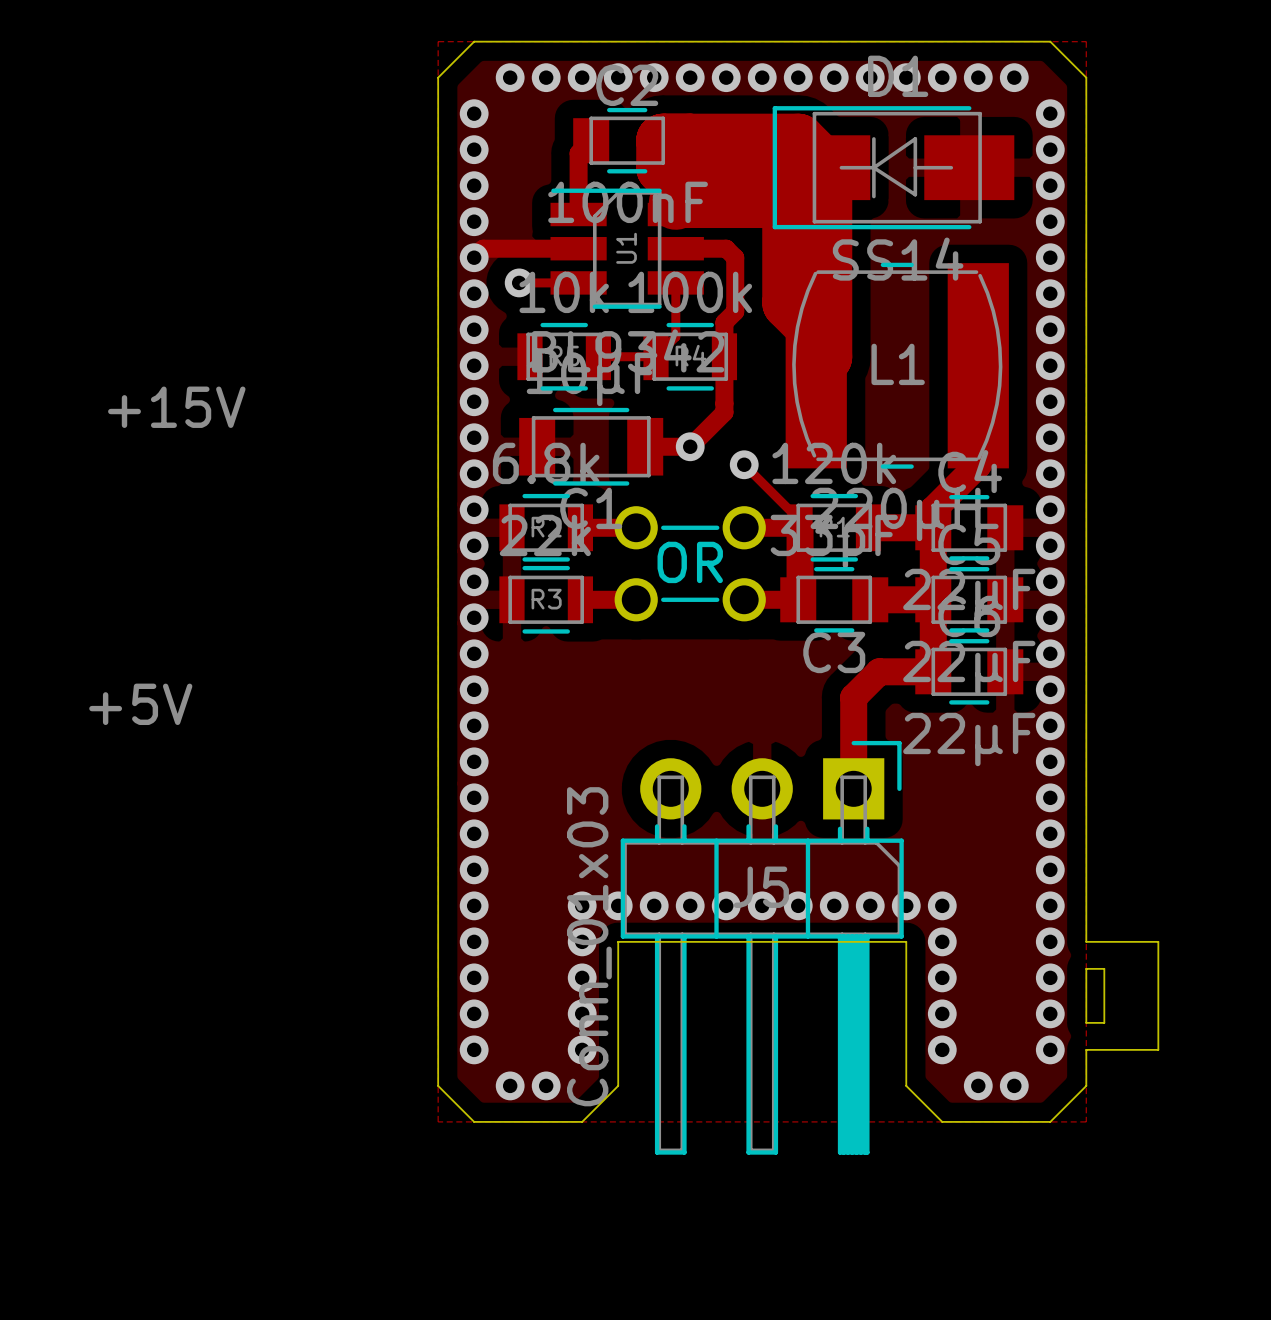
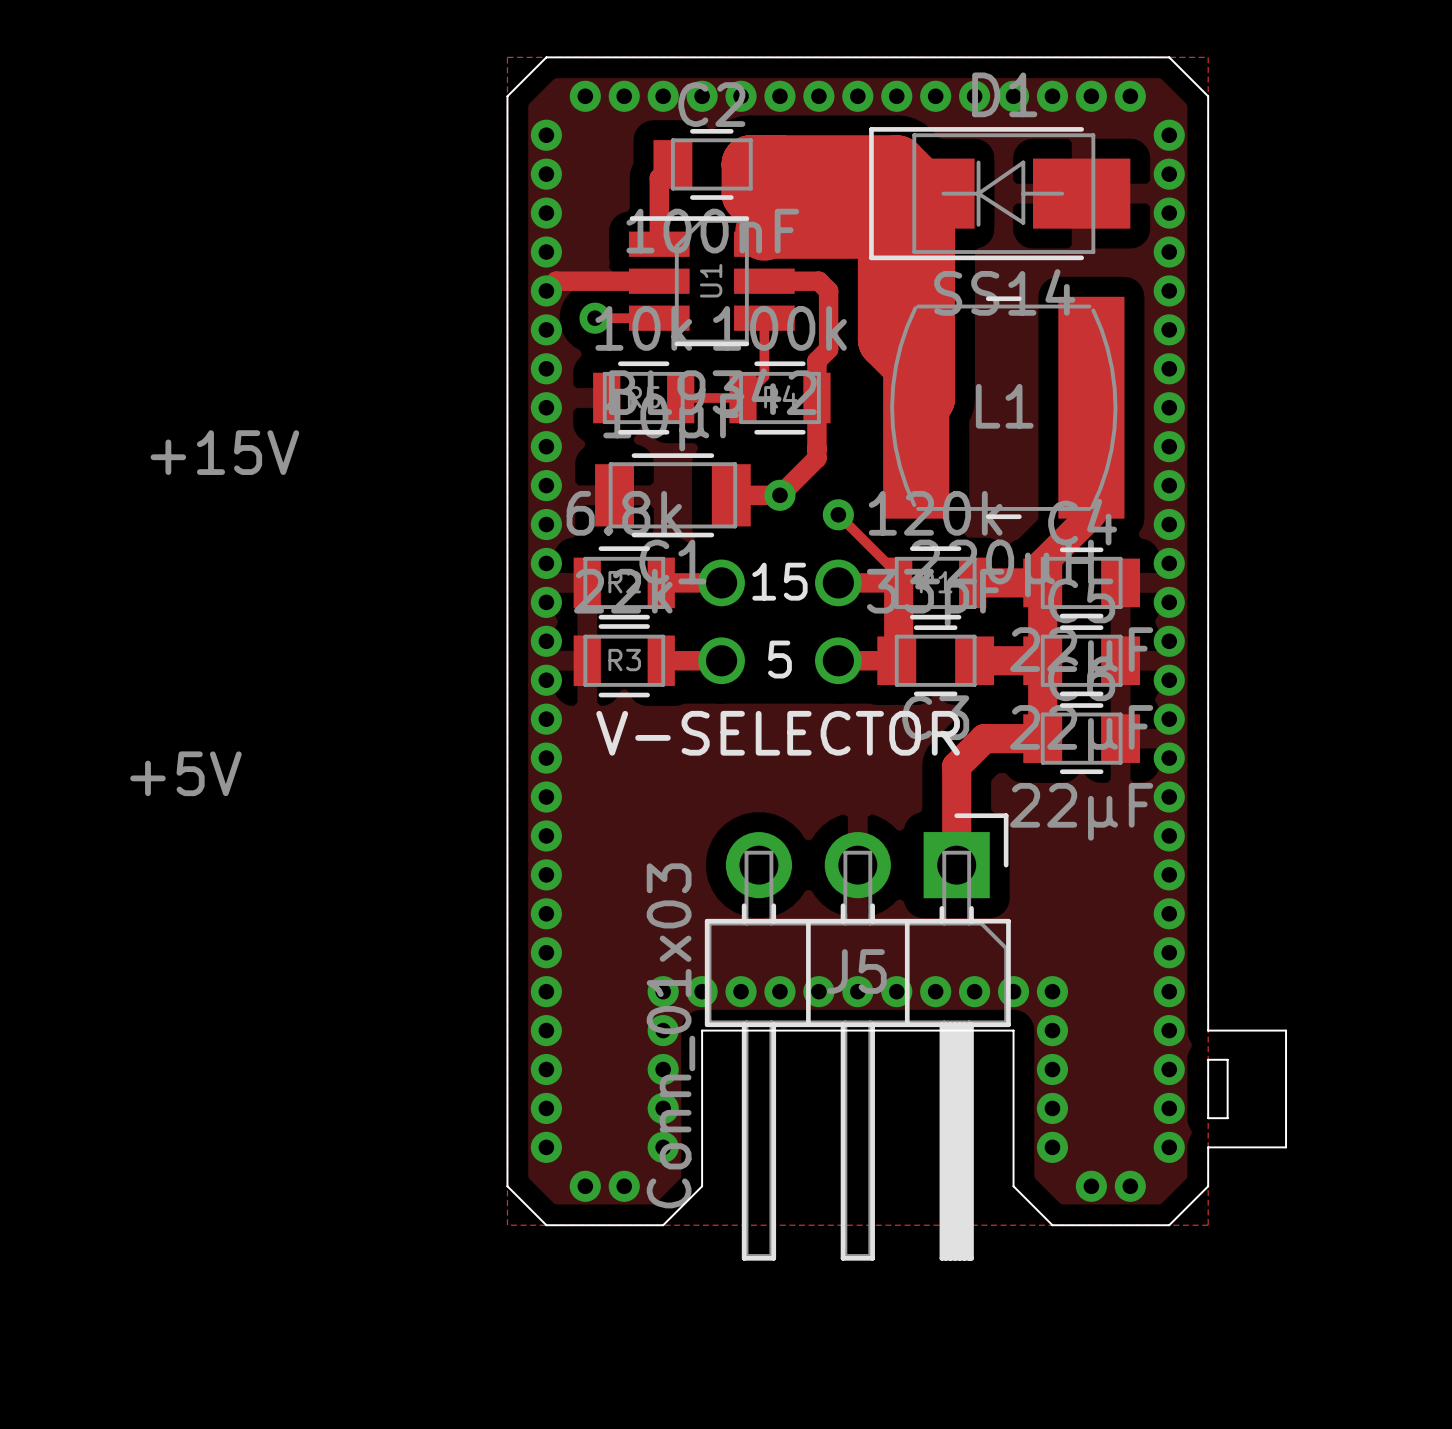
text: none -> 15 (779, 581)
line: (663, 527) (717, 527) -> none
text: OR (690, 562) -> none
text: none -> 5 (779, 659)
line: (663, 599) (717, 599) -> none
text: none -> V-SELECTOR (778, 733)

